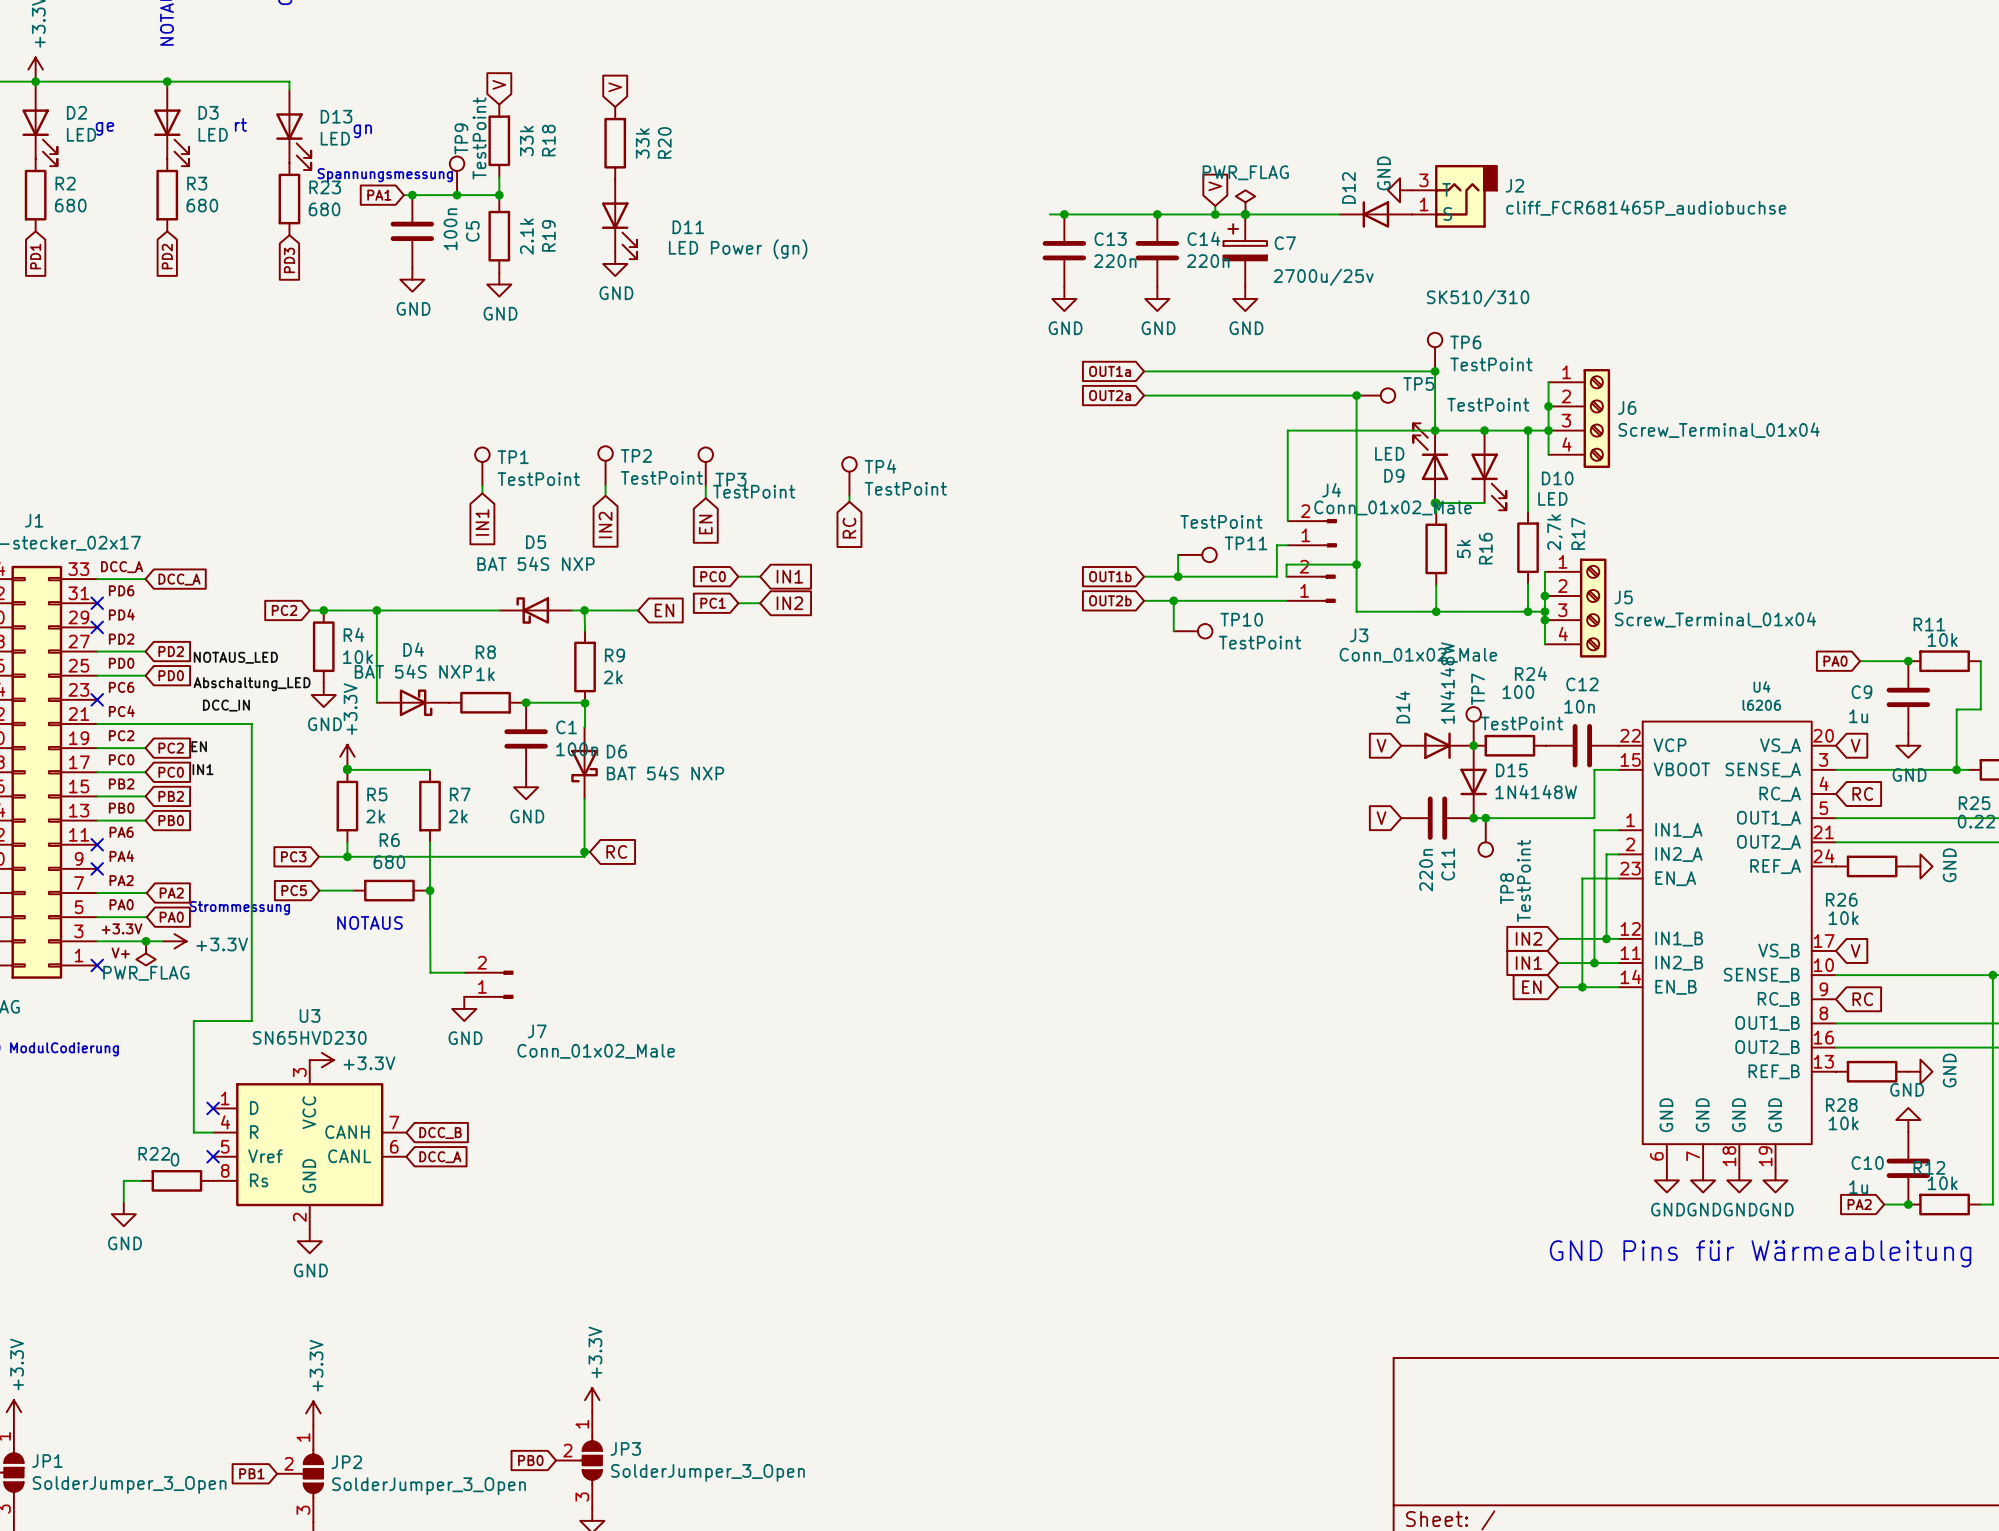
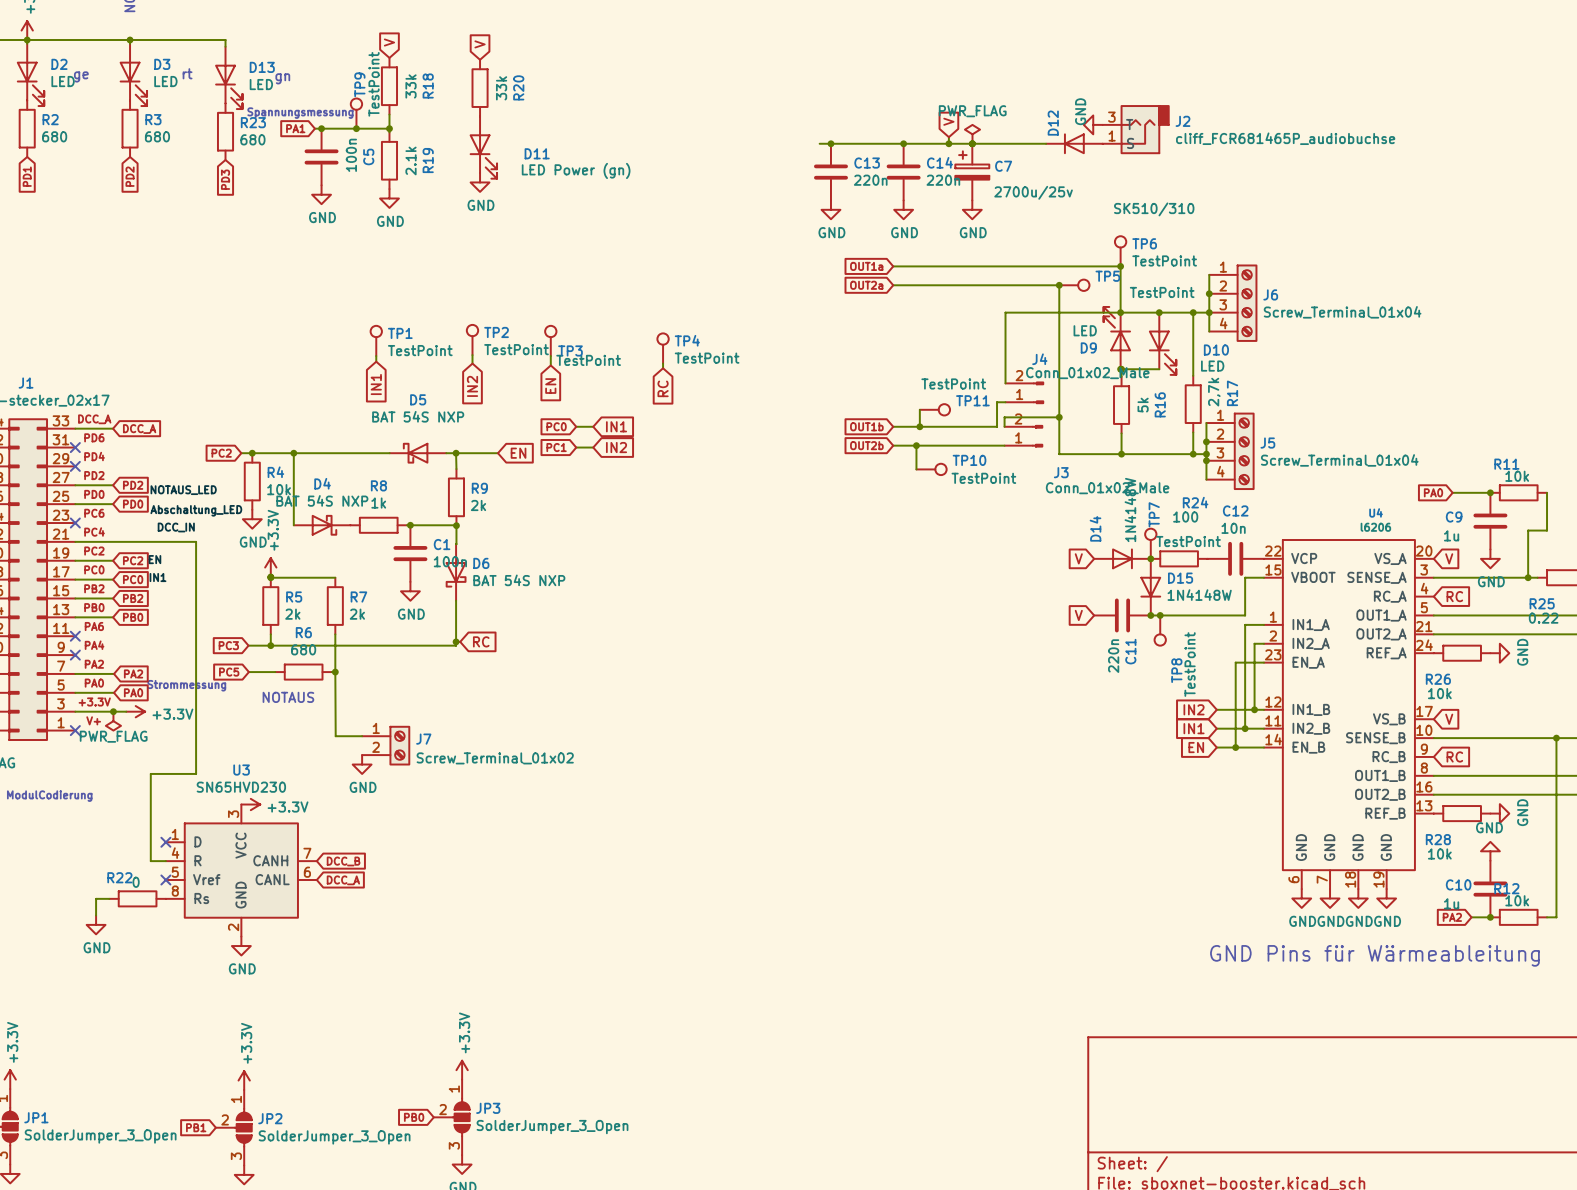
J7 symbol: [464, 970, 514, 999] -> [362, 725, 411, 766]
J7 name position: J7 (537, 1031) -> J7 (423, 739)
J7 value: Conn_01x02_Male (596, 1051) -> Screw_Terminal_01x02 (495, 758)

